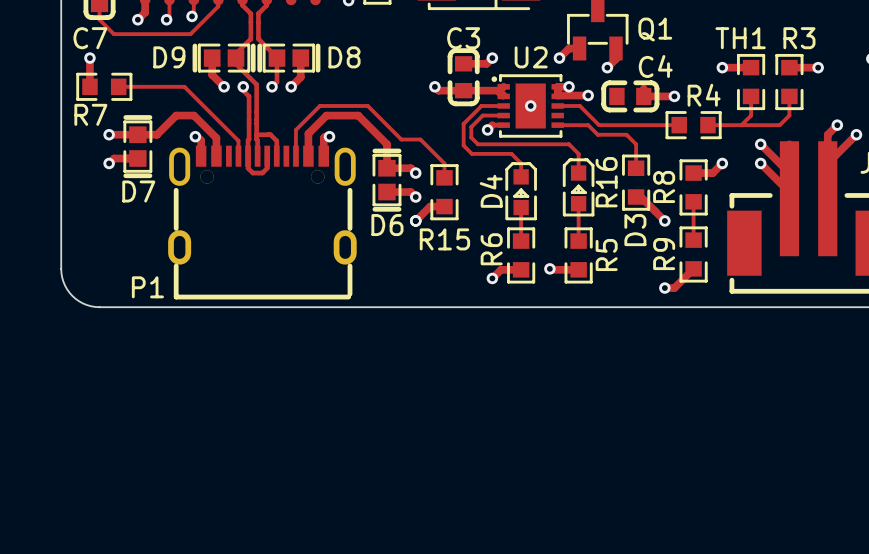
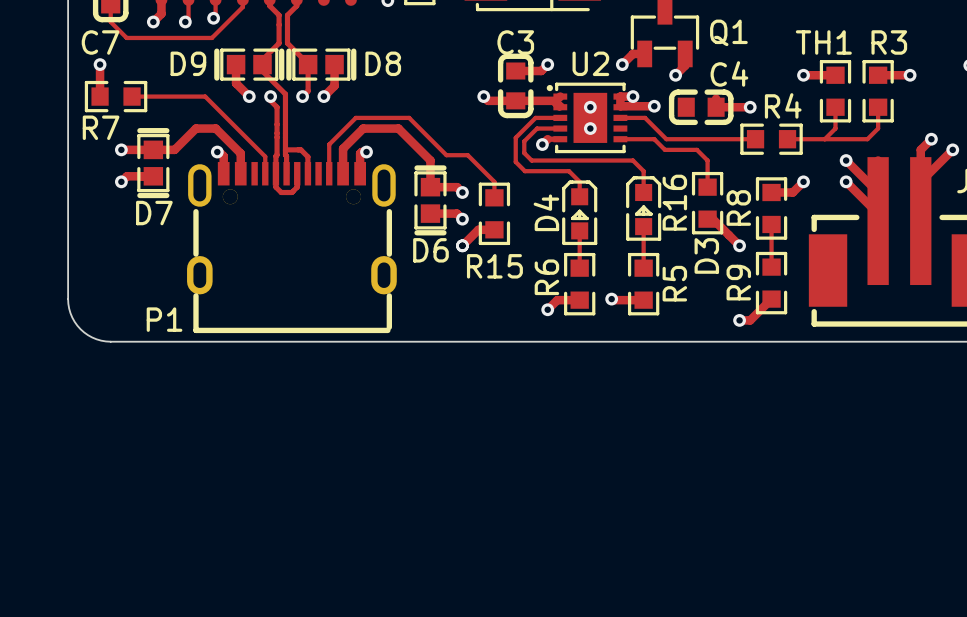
via: none -> (590, 107)
via: (530, 105) -> none
via: none -> (590, 128)

